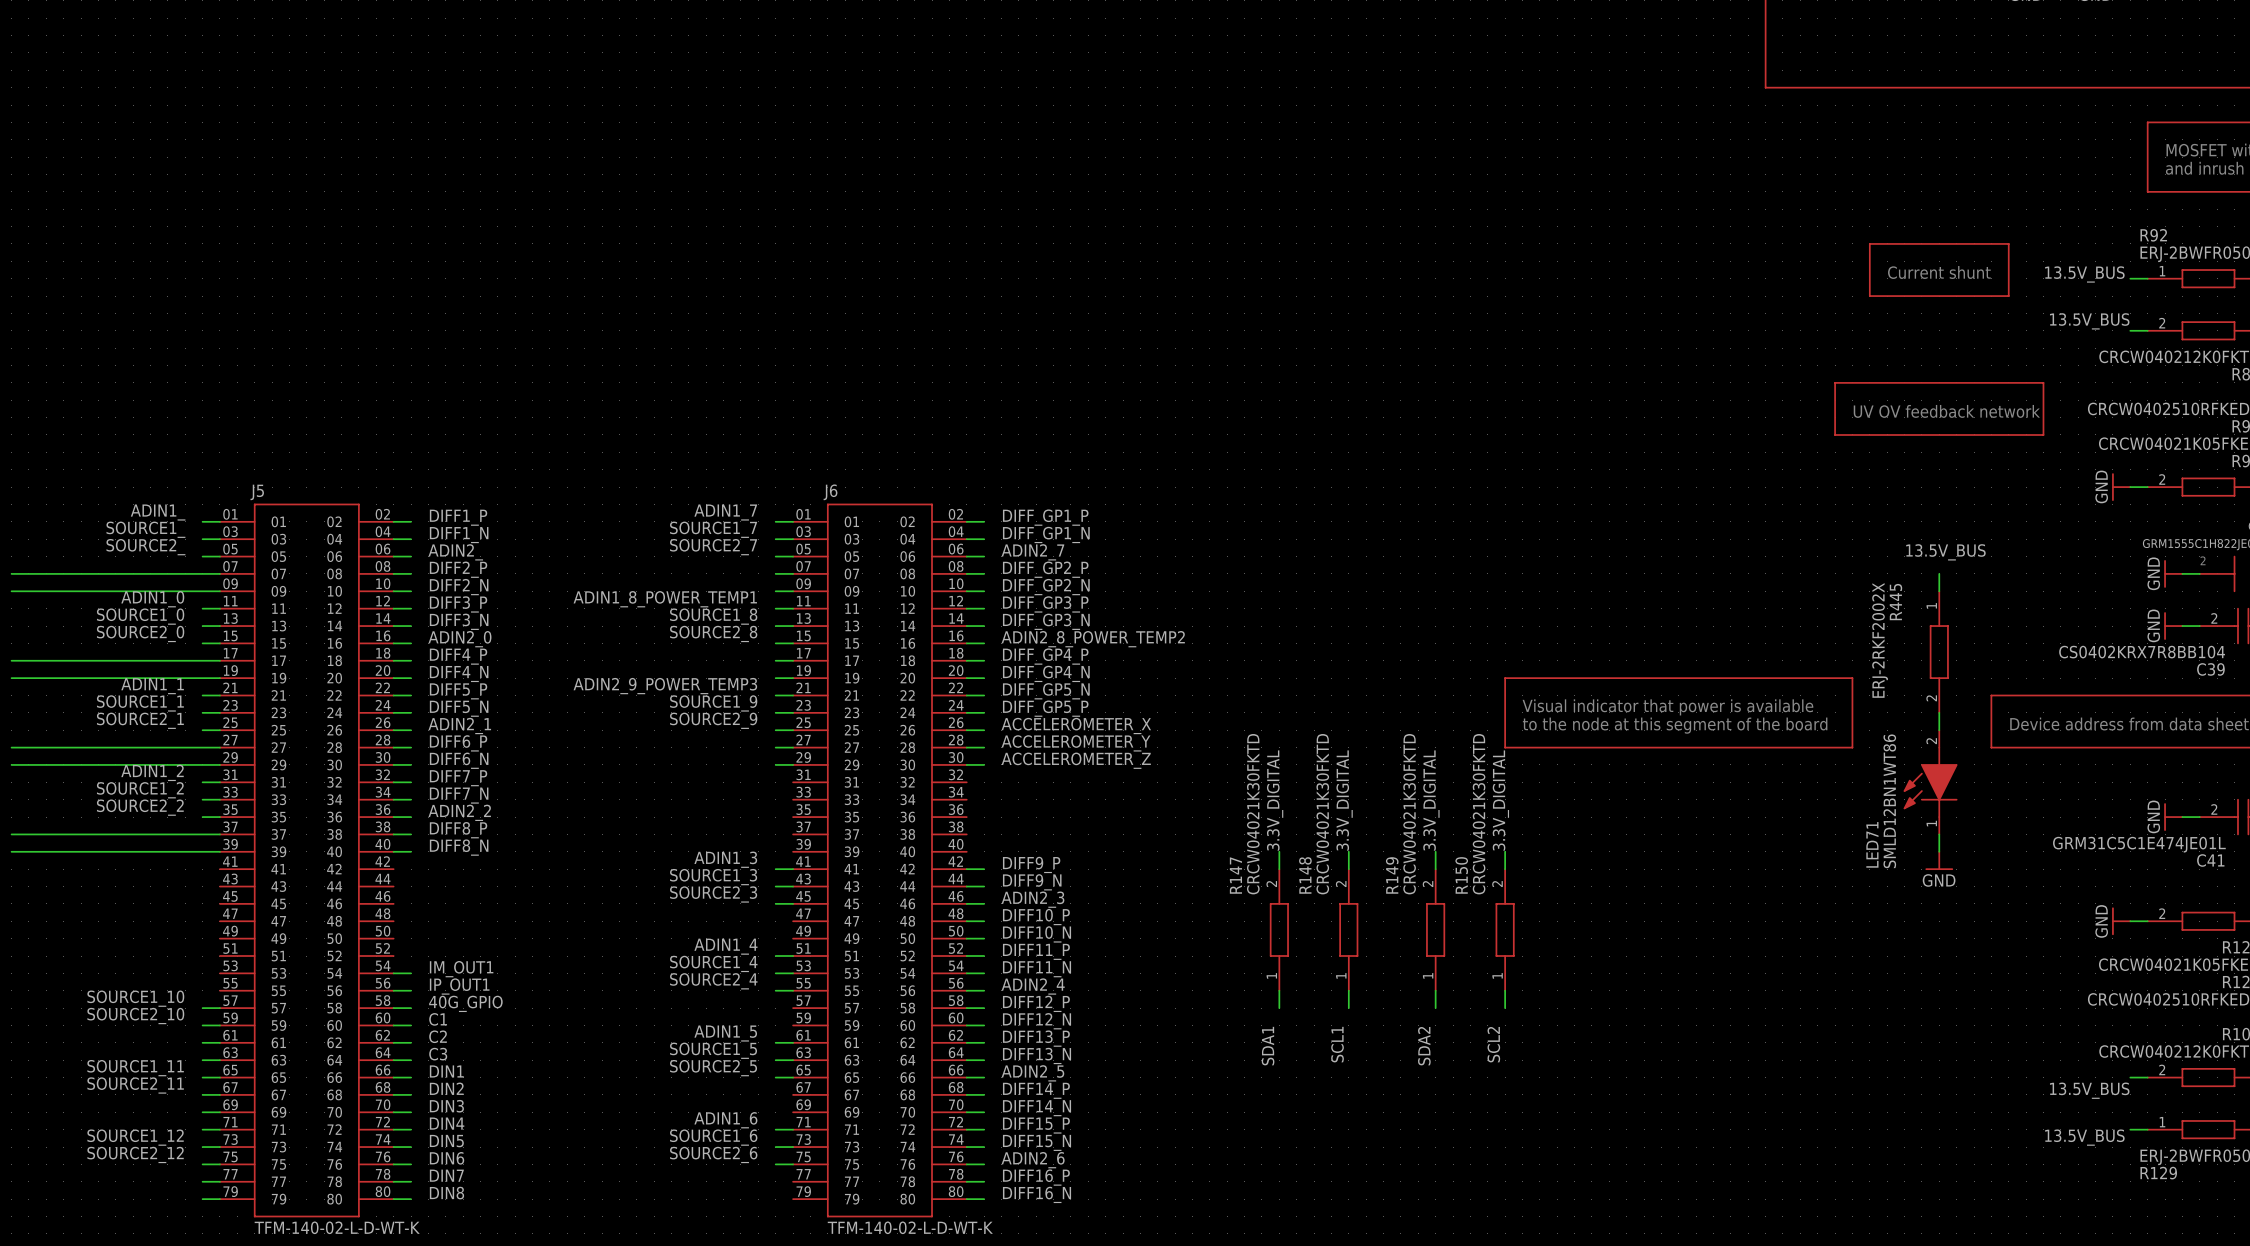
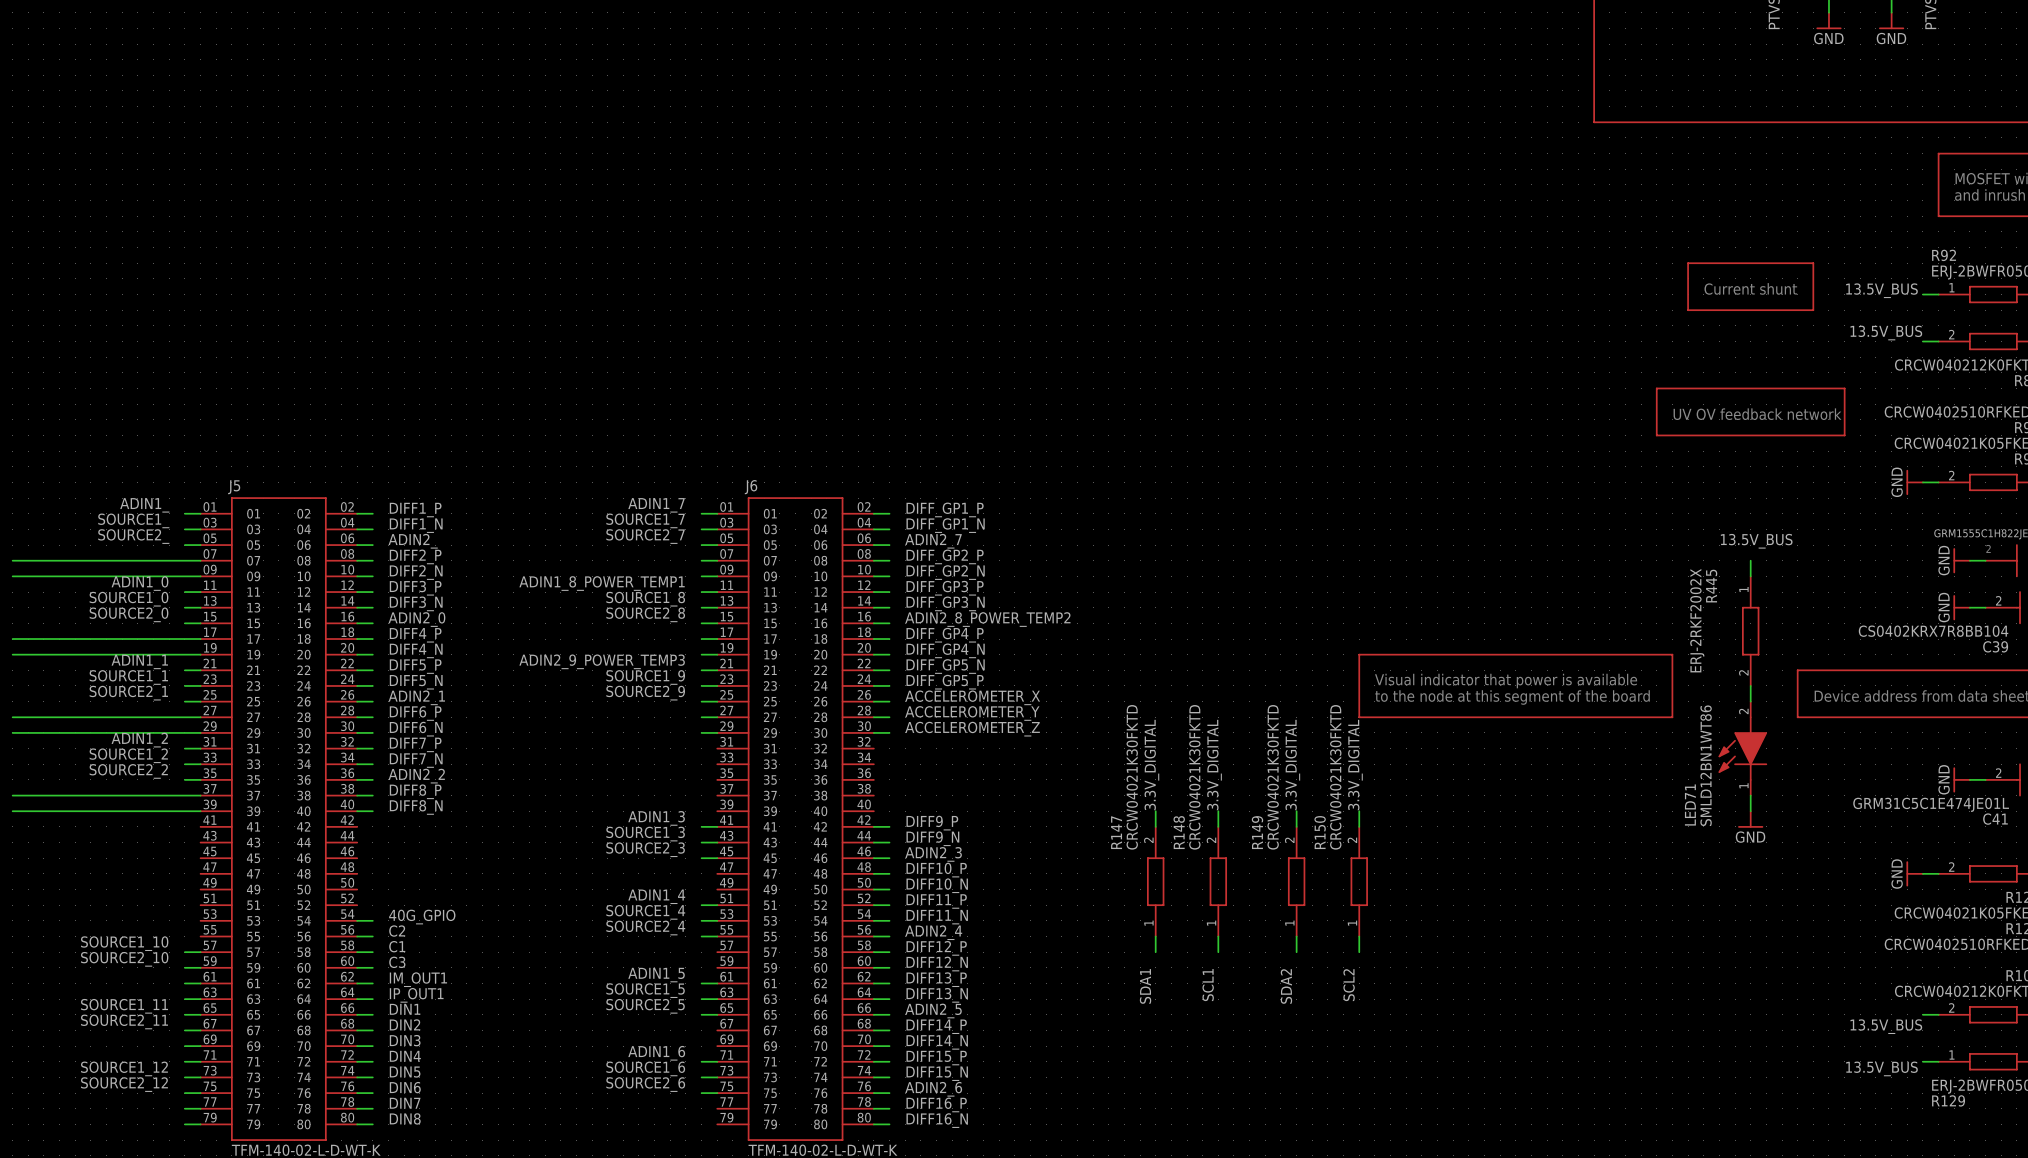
label: IM_OUT1 (461, 969) -> 40G_GPIO (422, 917)
label: IP_OUT1 (459, 986) -> C2 (397, 931)
label: 40G_GPIO (465, 1003) -> C1 (397, 946)
label: C1 (438, 1019) -> C3 (397, 962)
label: C2 (438, 1036) -> IM_OUT1 (418, 979)
label: C3 (438, 1054) -> IP_OUT1 (416, 995)

